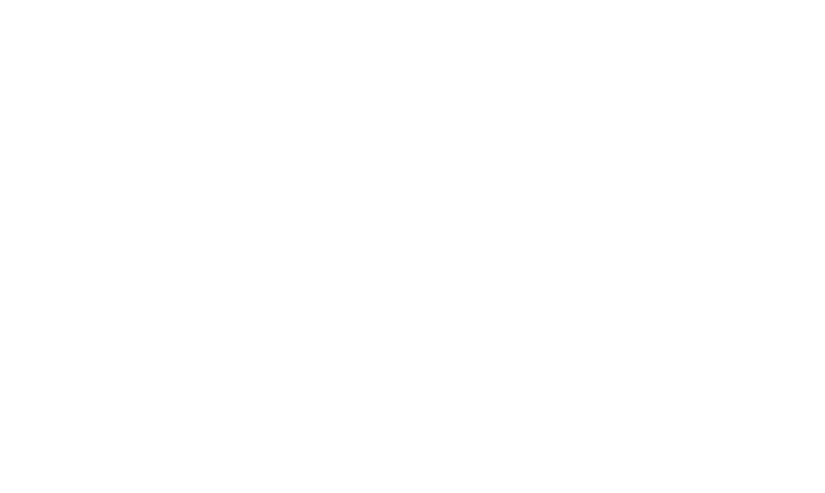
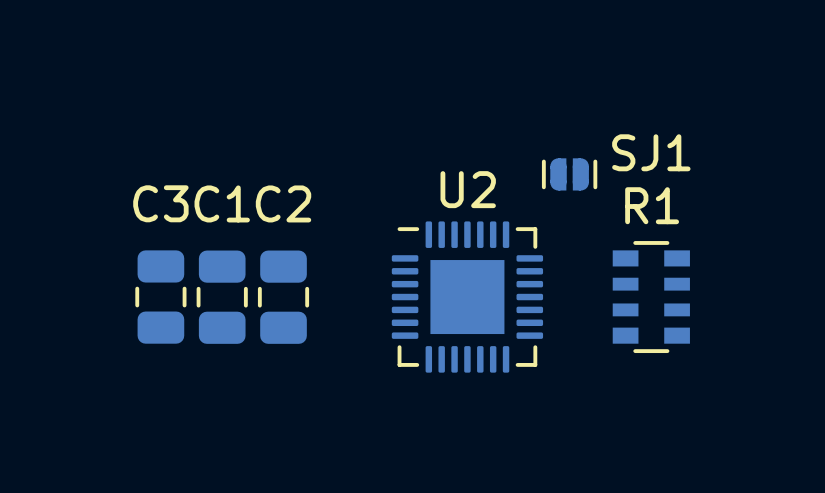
SJ1: none -> (569, 174)
C3: none -> (160, 297)
C1: none -> (222, 297)
C2: none -> (283, 297)
U2: none -> (467, 297)
R1: none -> (651, 297)

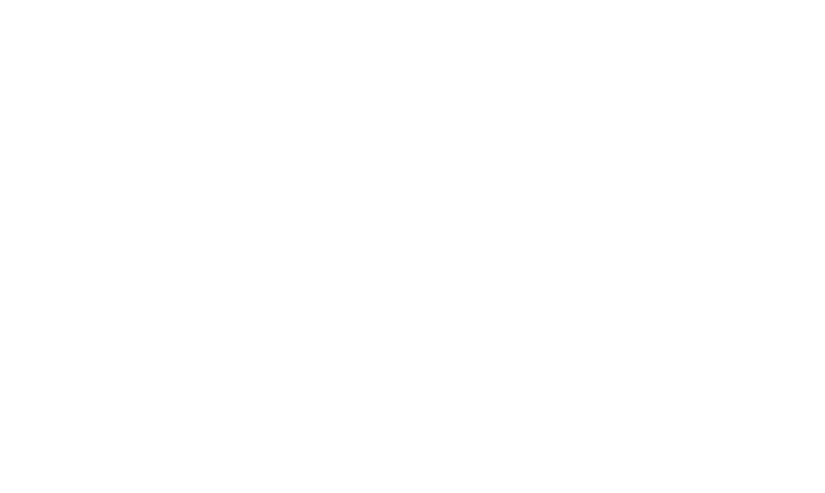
SJ1: (569, 174) -> none
C3: (160, 297) -> none
C1: (222, 297) -> none
C2: (283, 297) -> none
U2: (467, 297) -> none
R1: (651, 297) -> none

